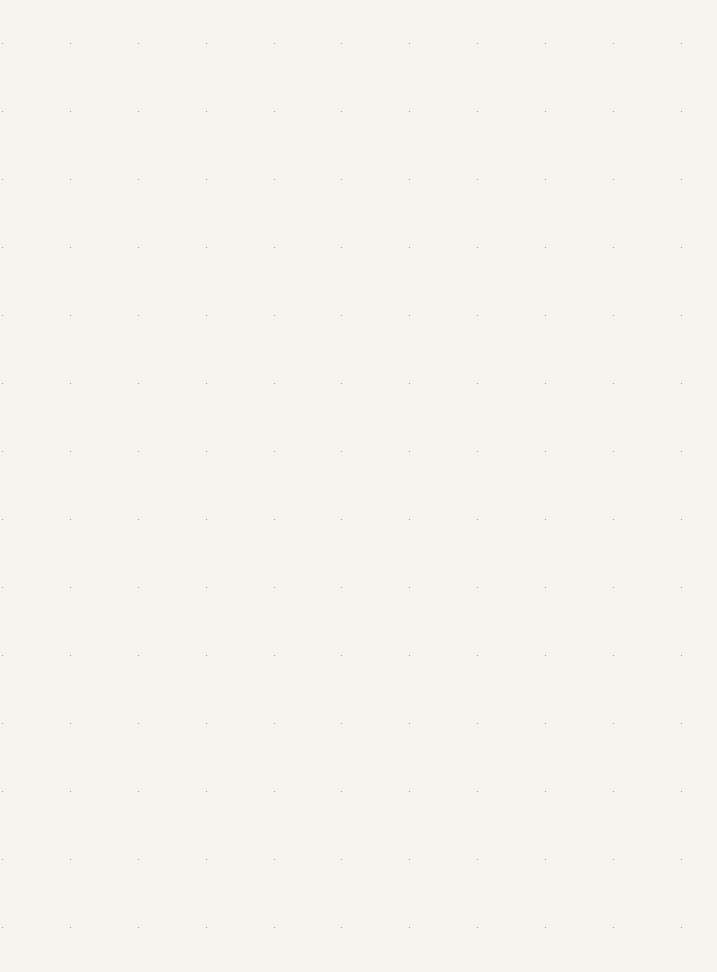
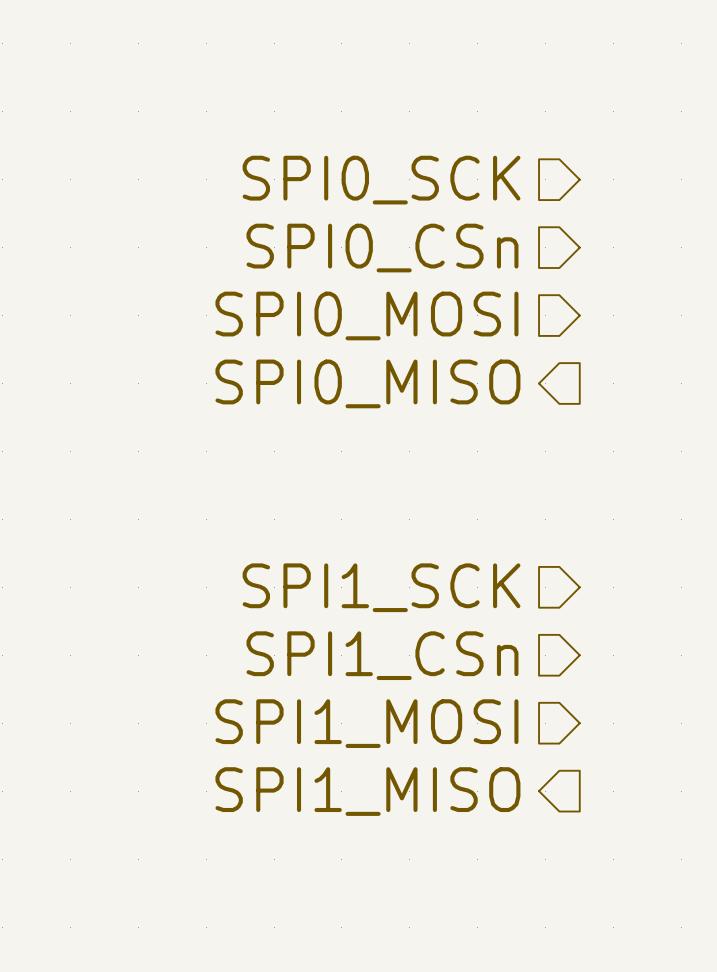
hierarchical label: none -> SPI0_SCK (381, 180)
hierarchical label: none -> SPI0_CSn (382, 248)
hierarchical label: none -> SPI0_MOSI (366, 315)
hierarchical label: none -> SPI0_MISO (367, 383)
hierarchical label: none -> SPI1_SCK (381, 587)
hierarchical label: none -> SPI1_CSn (382, 655)
hierarchical label: none -> SPI1_MOSI (366, 723)
hierarchical label: none -> SPI1_MISO (367, 791)

